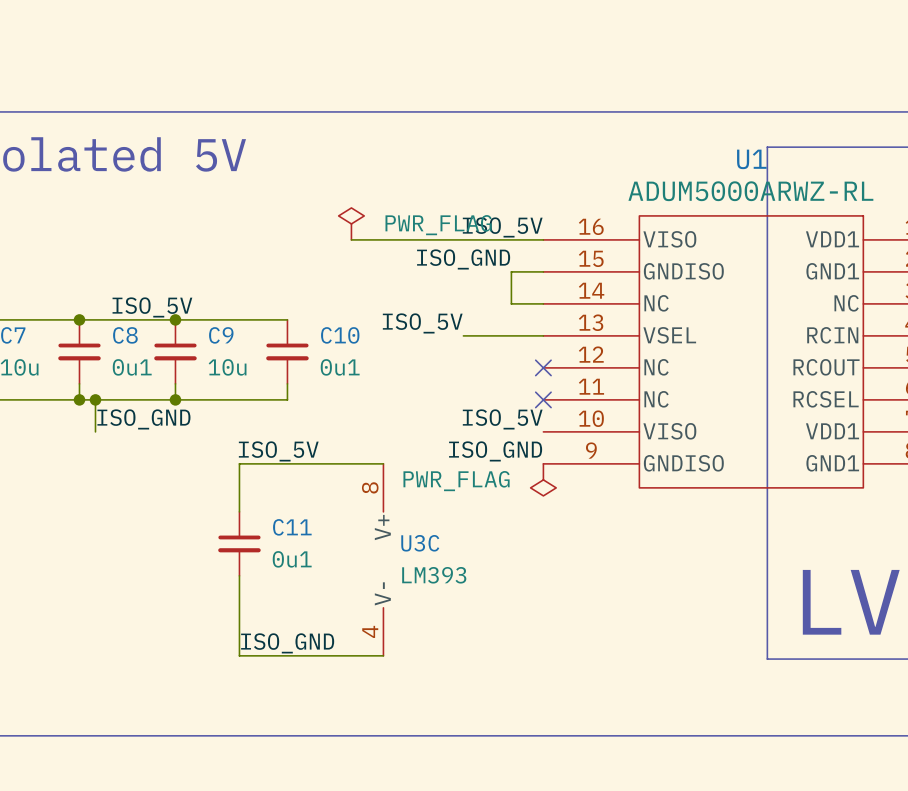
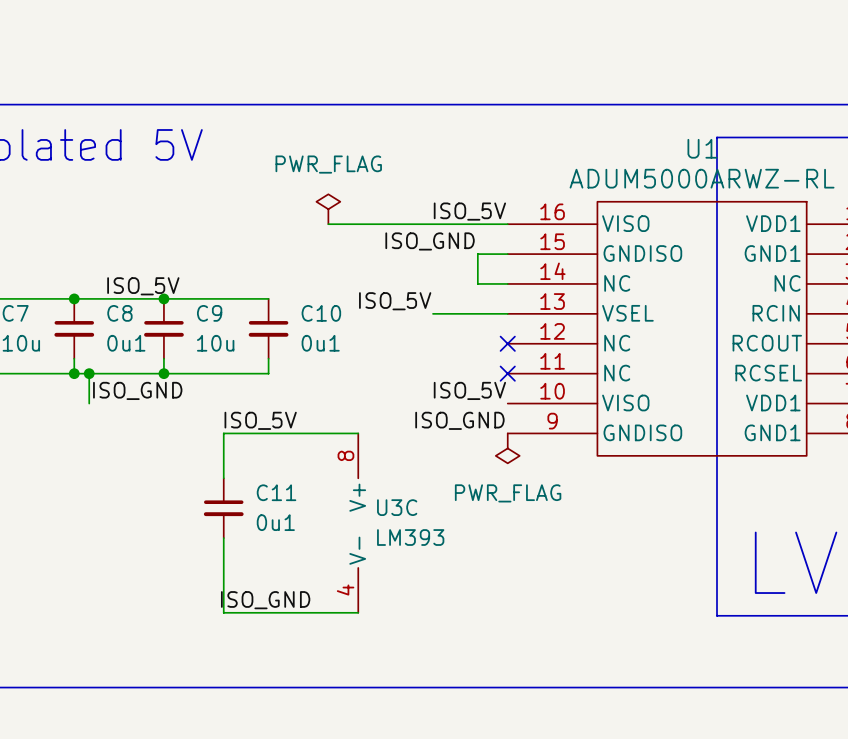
power symbol text position: PWR_FLAG (438, 225) -> PWR_FLAG (328, 164)
power symbol text position: PWR_FLAG (456, 481) -> PWR_FLAG (508, 493)

